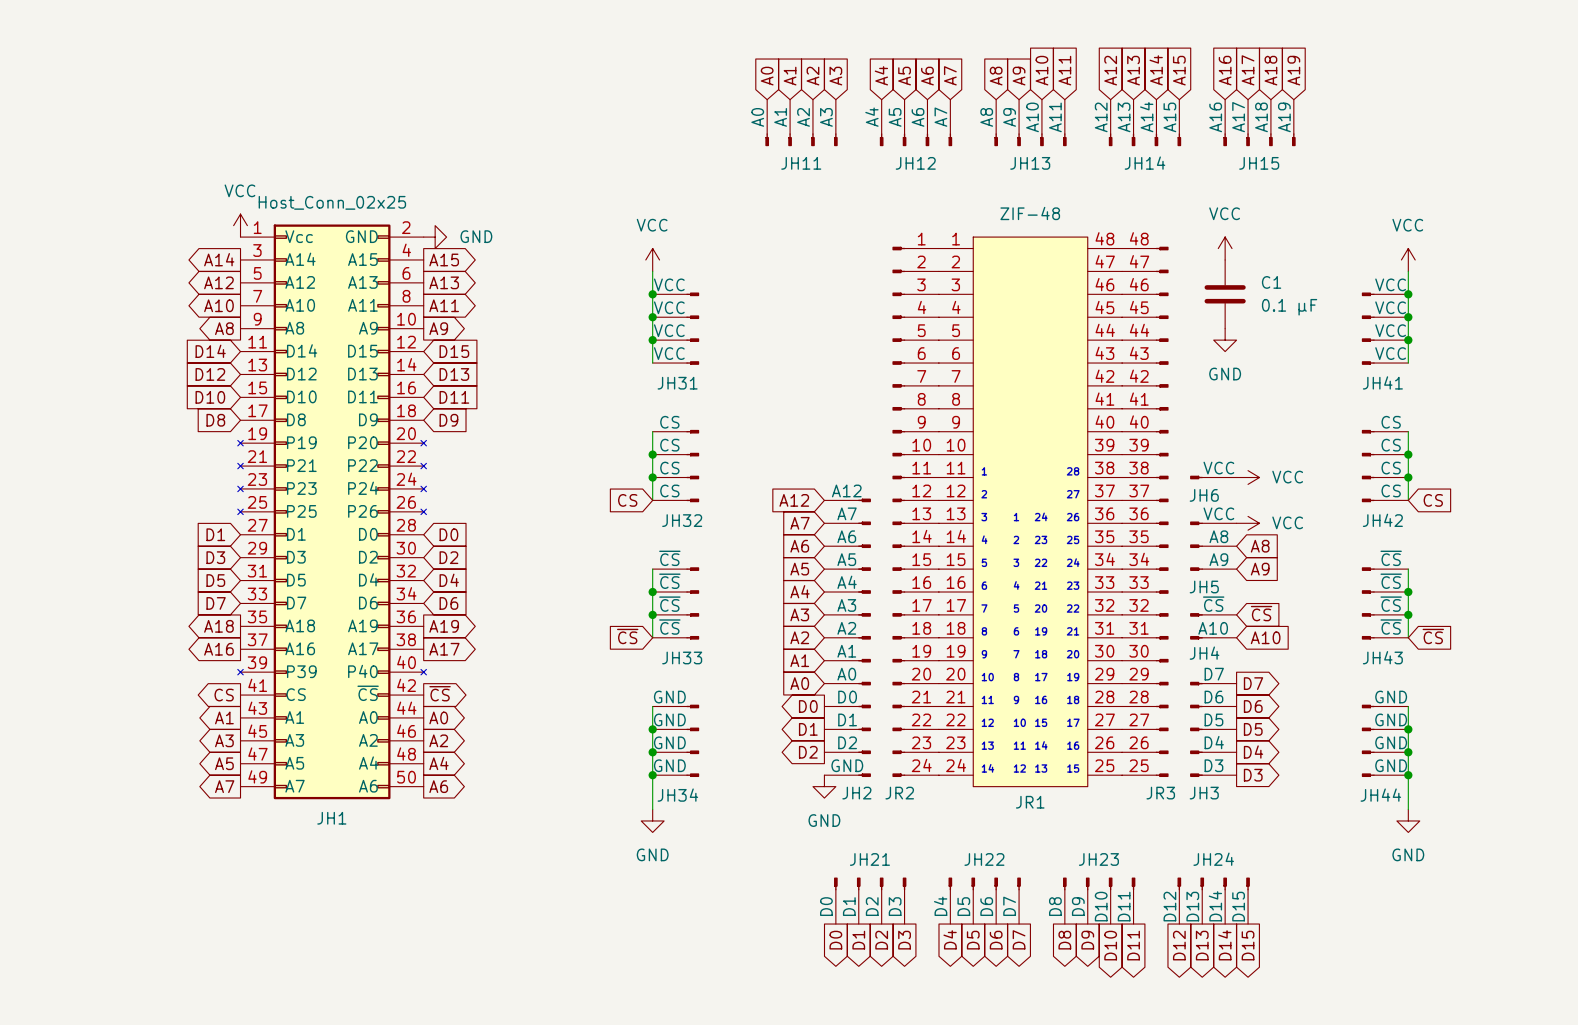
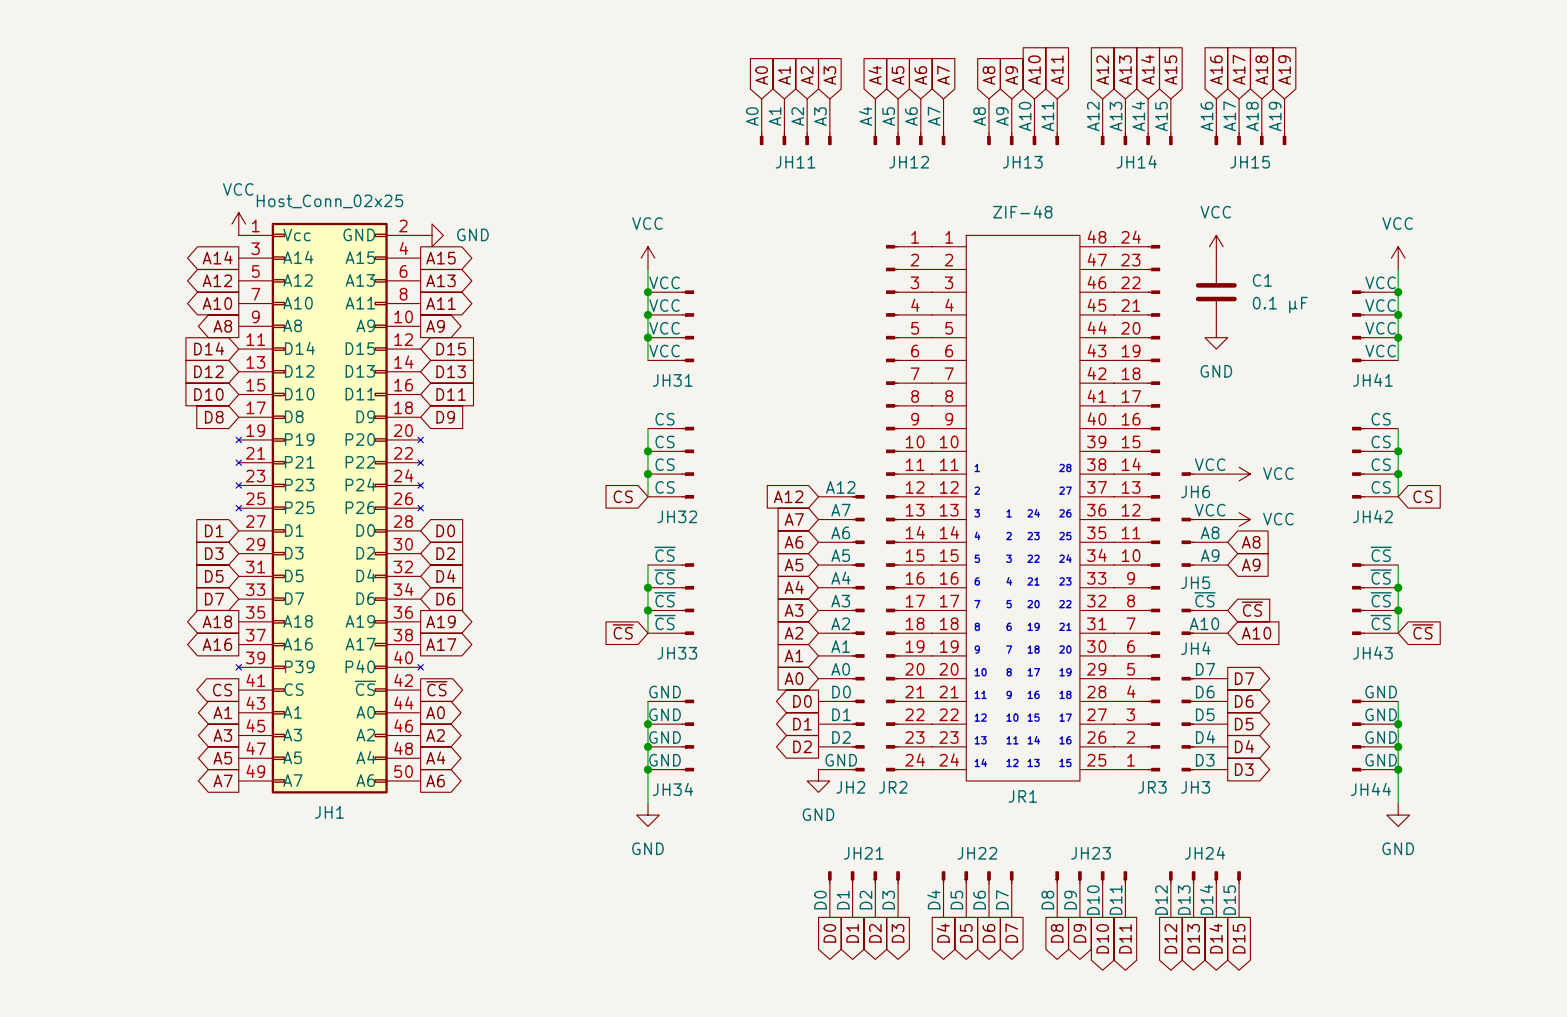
JR1 symbol: [938, 237, 1123, 787] -> [932, 235, 1115, 781]
JR3 symbol: [1122, 246, 1169, 778] -> [1114, 244, 1161, 772]

